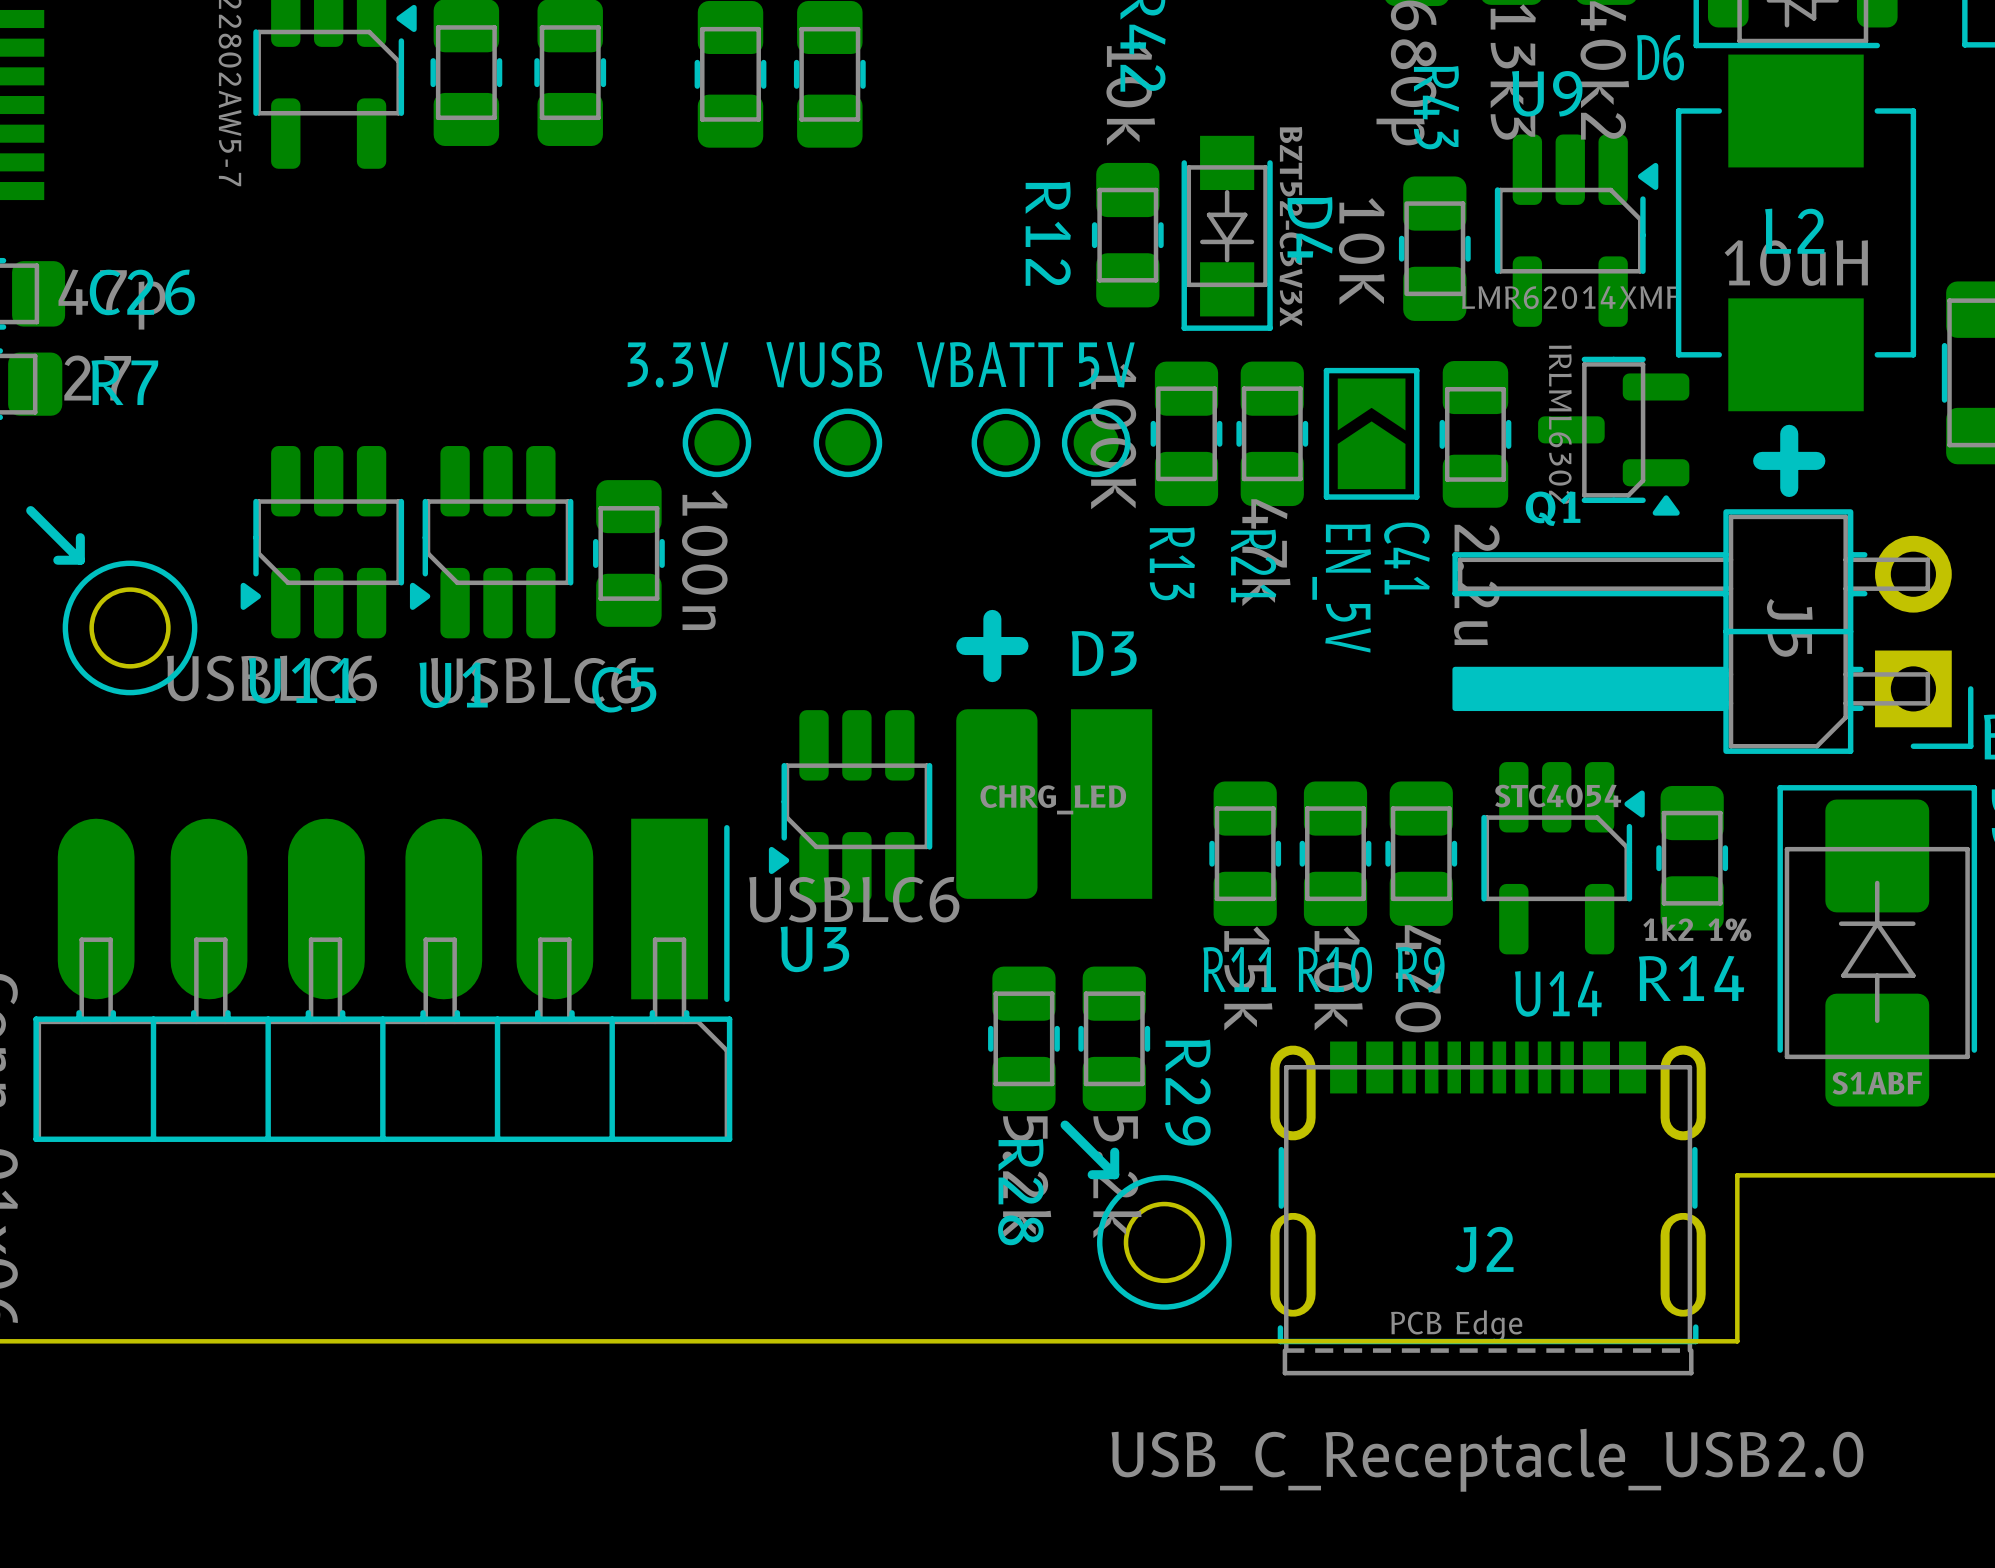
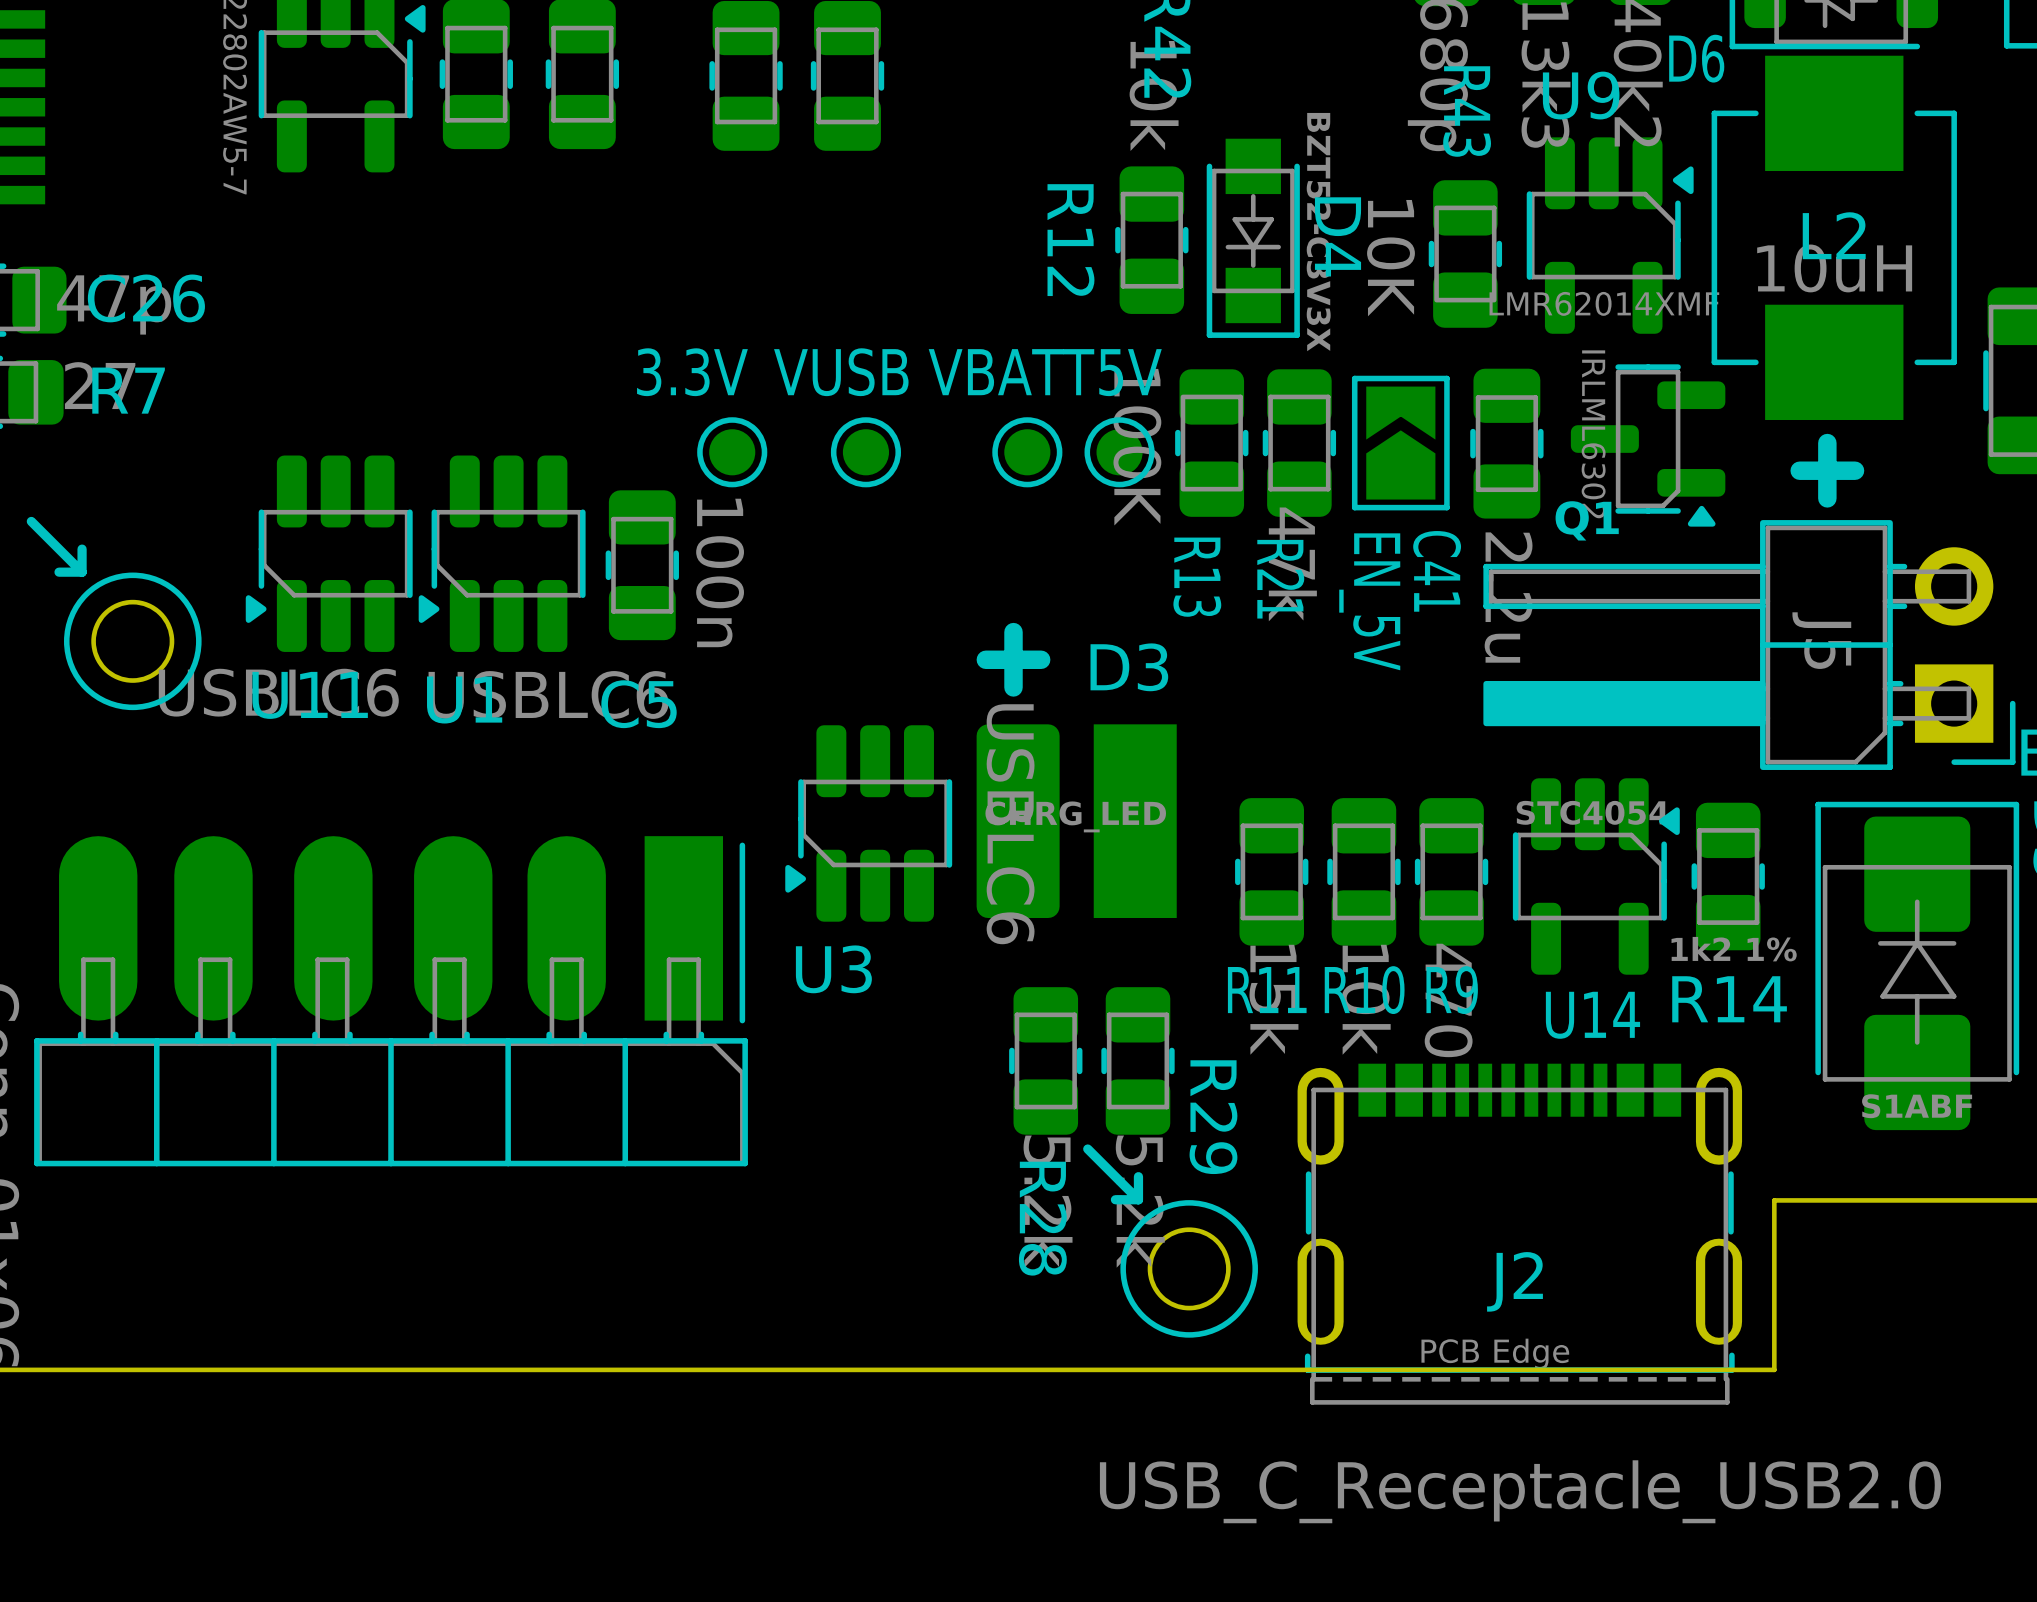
U3 value rotation: 0° (854, 899) -> 90° clockwise (1010, 824)

